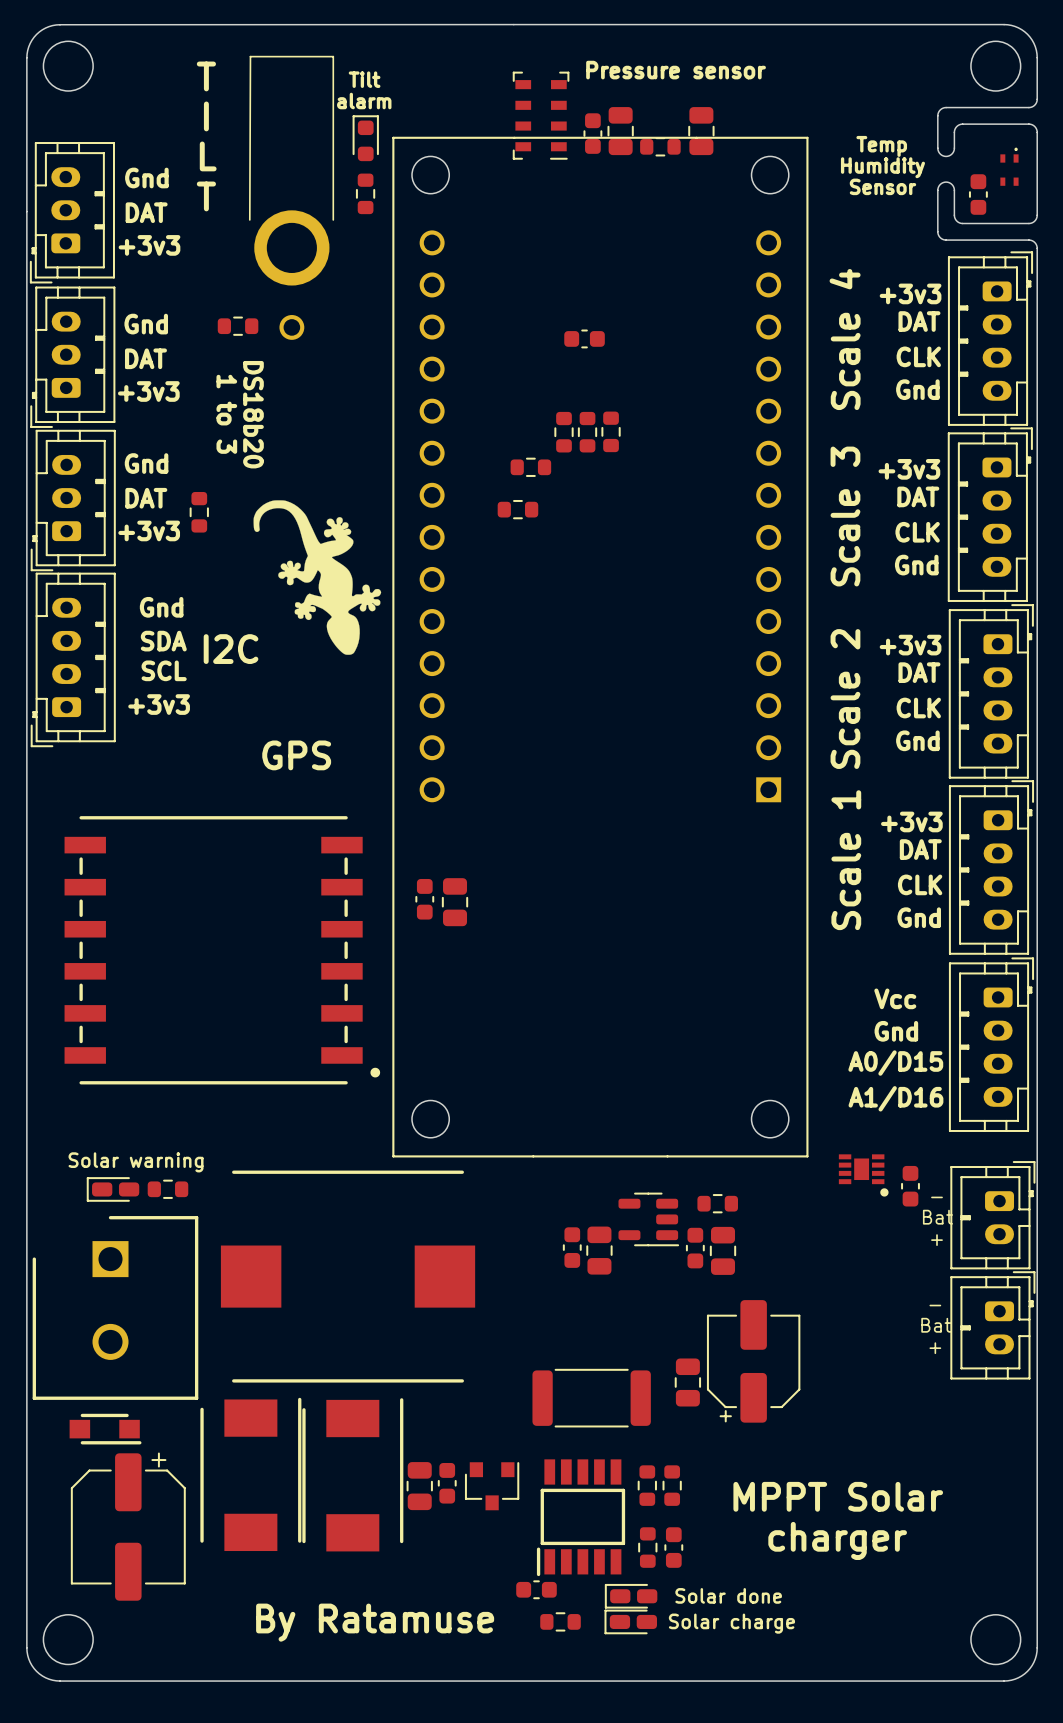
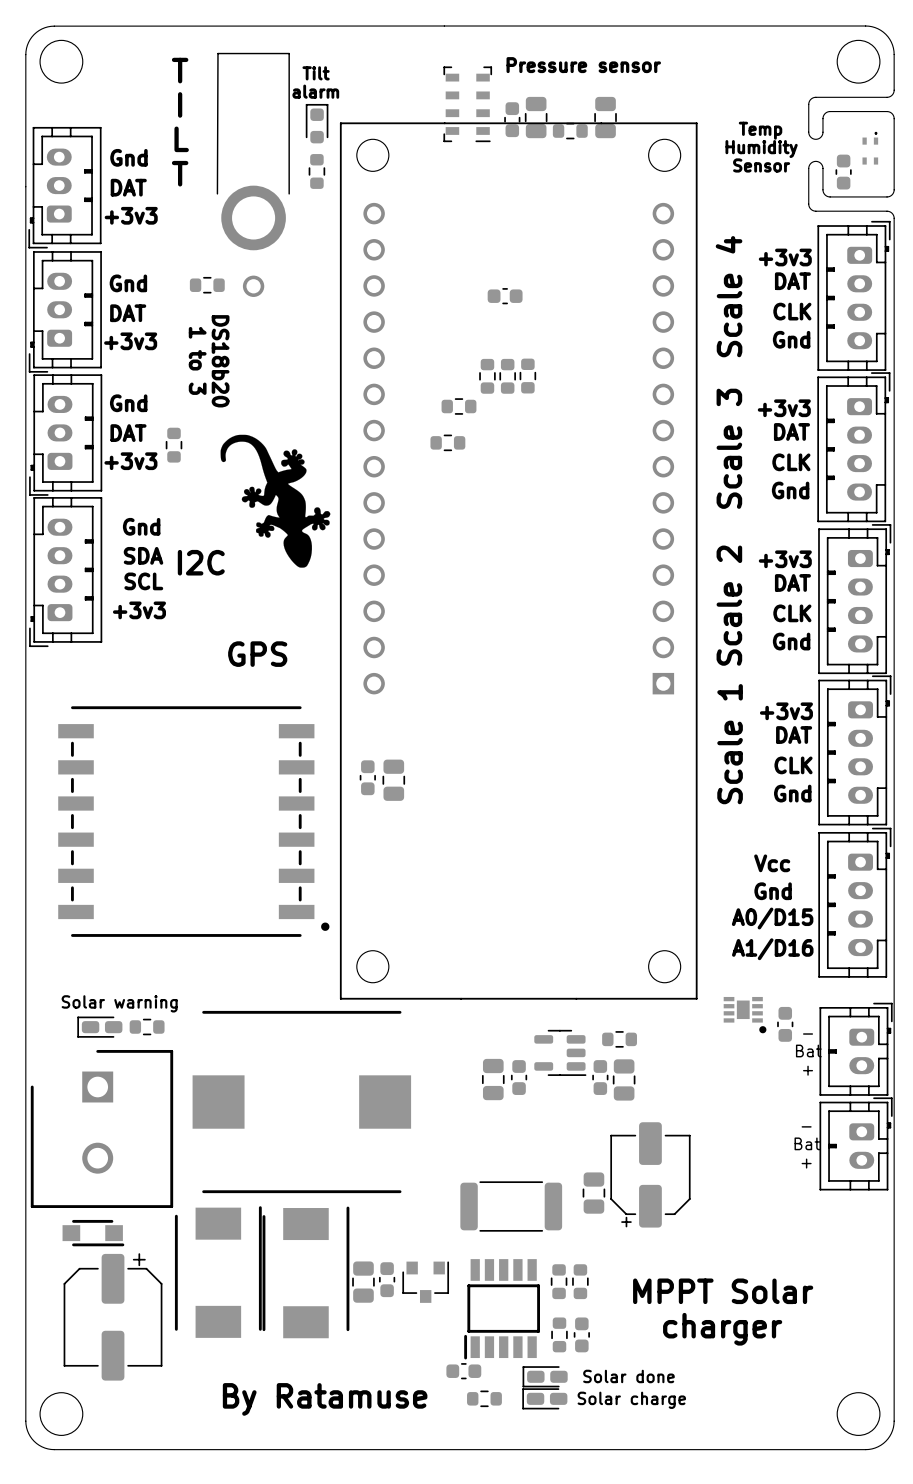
part footprint: [586, 1226, 613, 1275] -> [510, 1060, 528, 1095]
part footprint: [562, 1227, 582, 1268] -> [481, 1058, 505, 1101]

